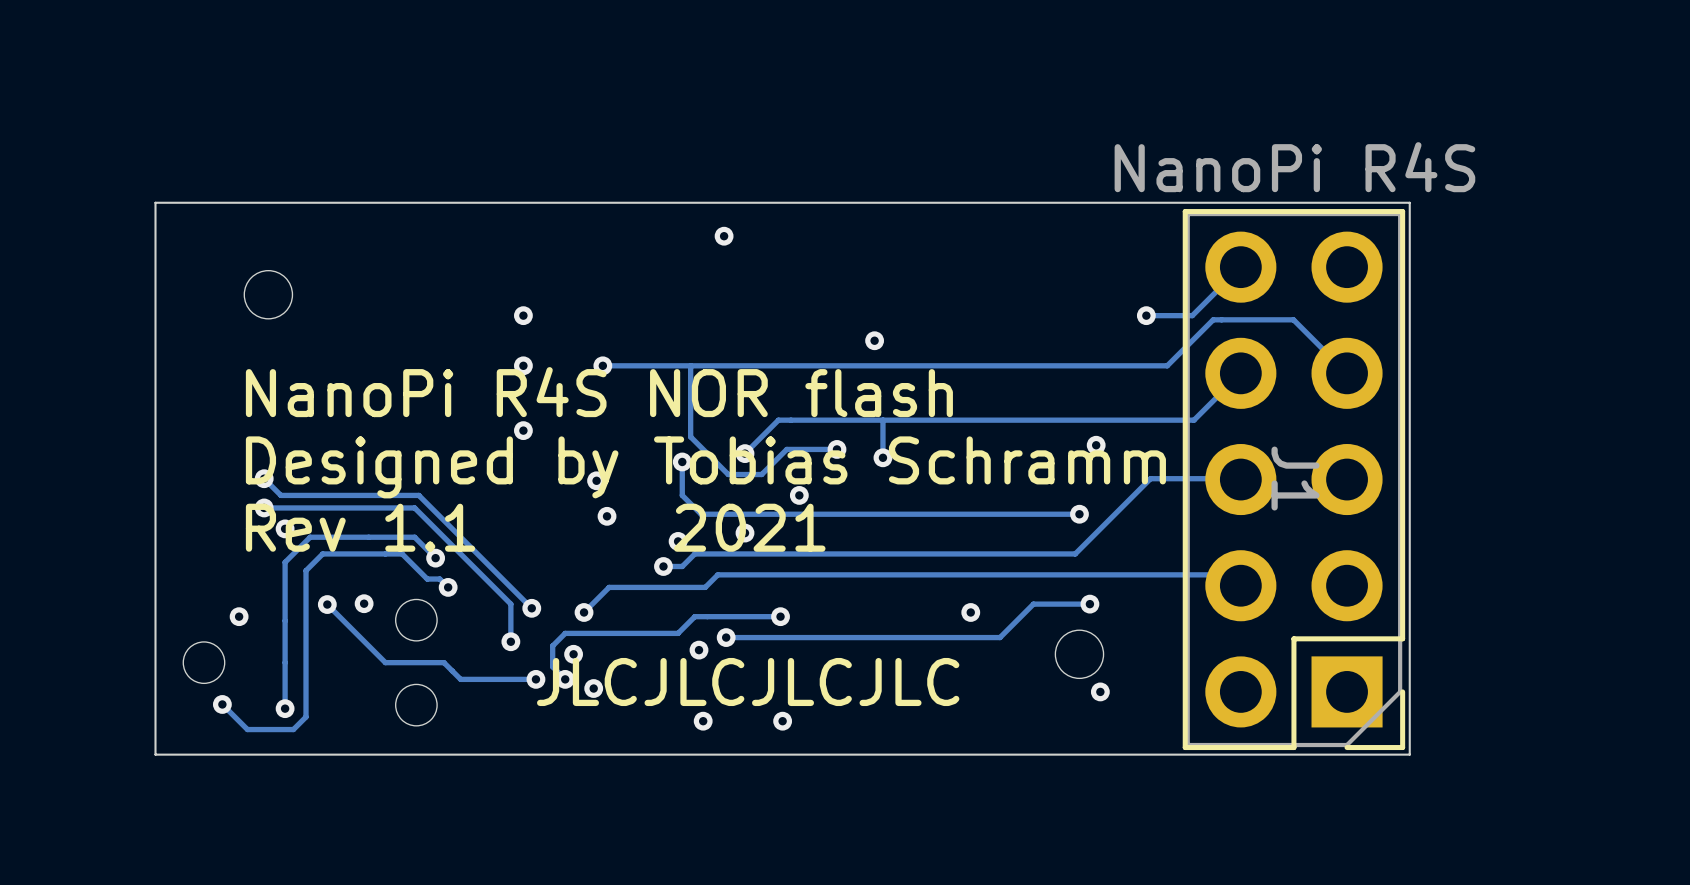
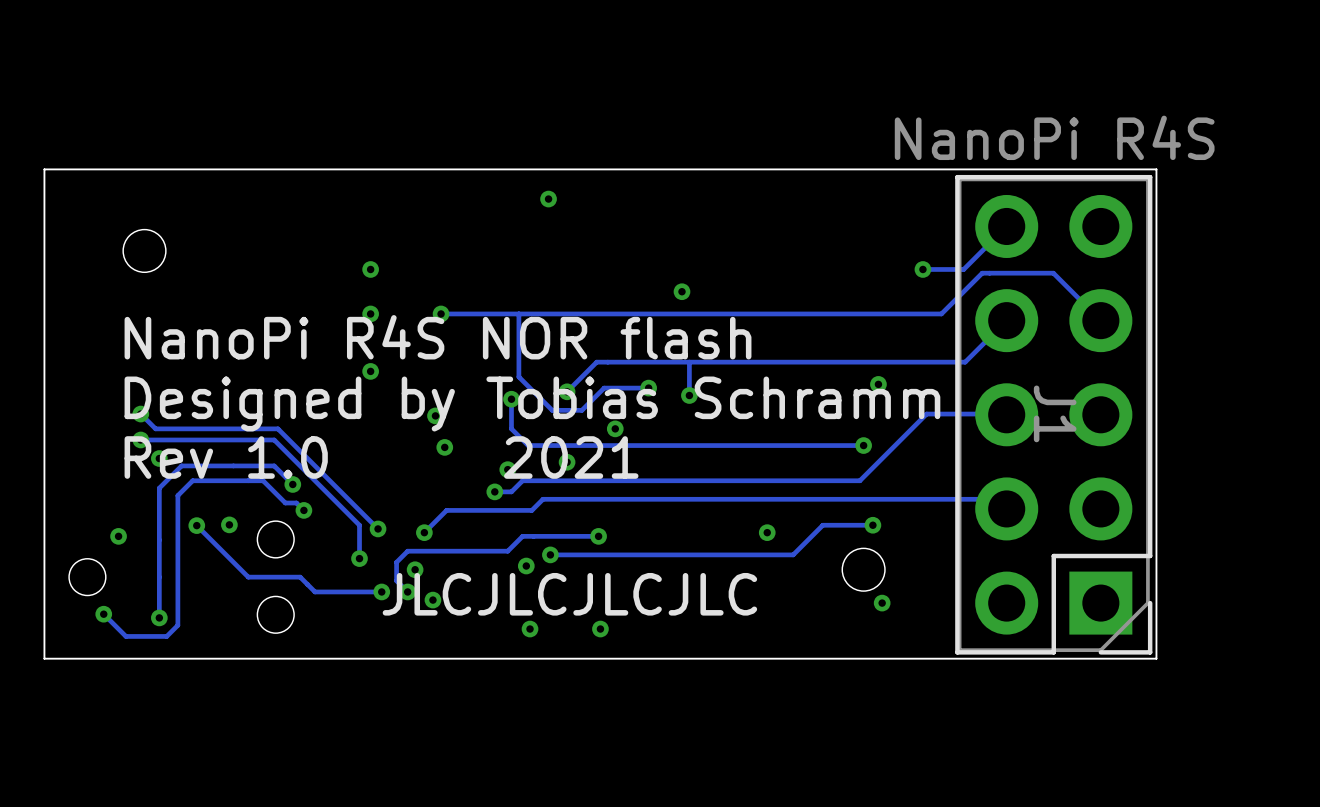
text: Rev 1.1 2021 (535, 527) -> Rev 1.0 2021 (381, 457)

